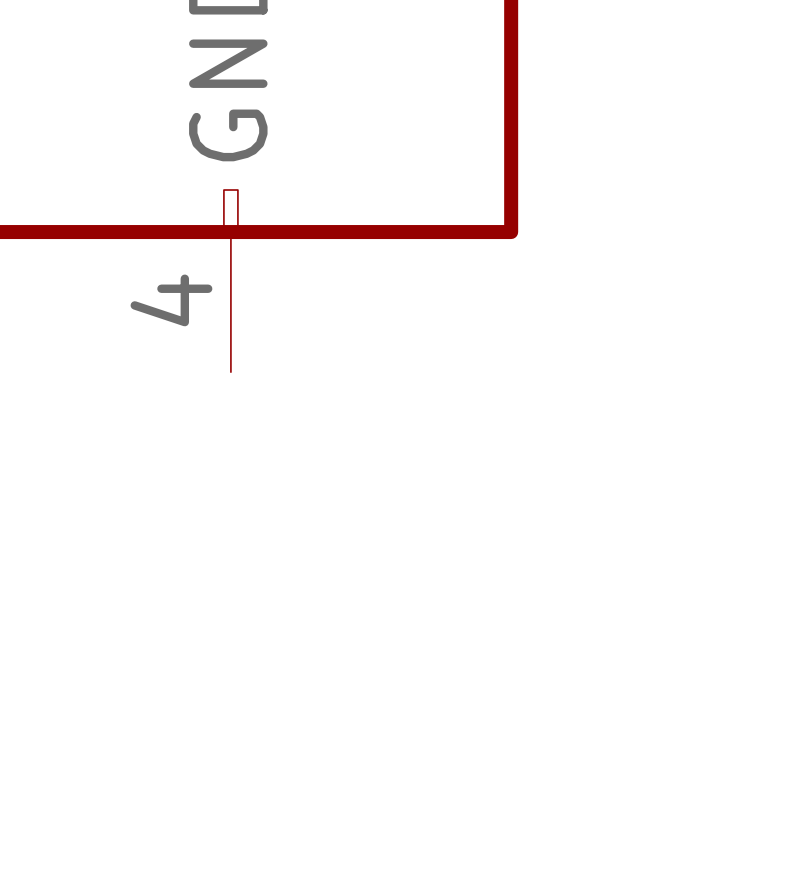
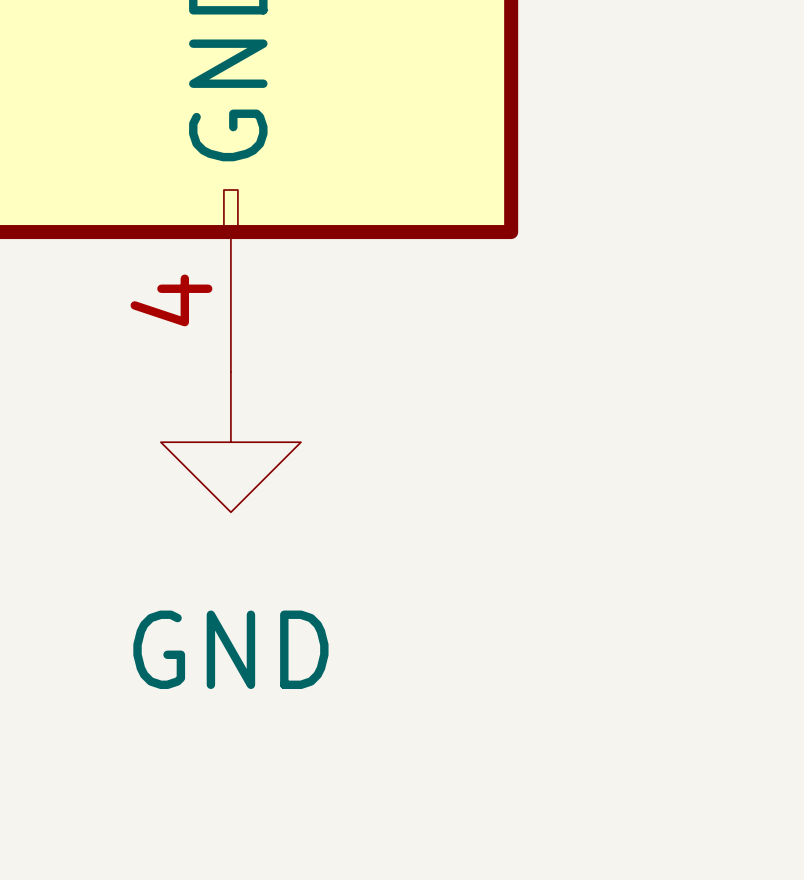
power symbol: none -> GND (230, 442)

